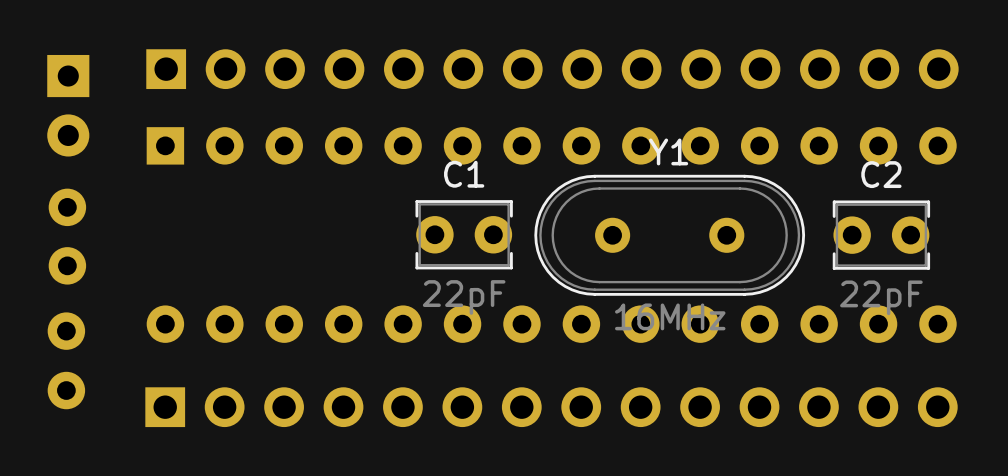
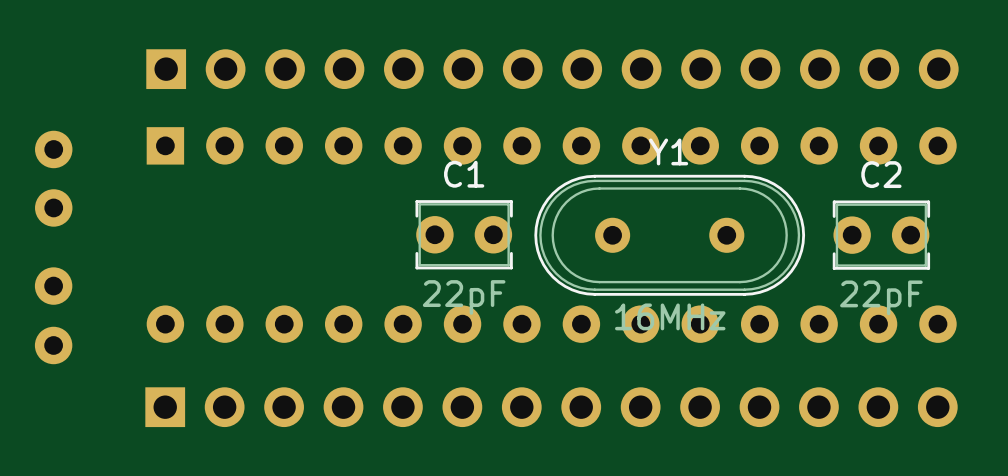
part: (68, 105) -> none
part position: (67, 236) -> (53, 178)
part position: (66, 360) -> (53, 315)

